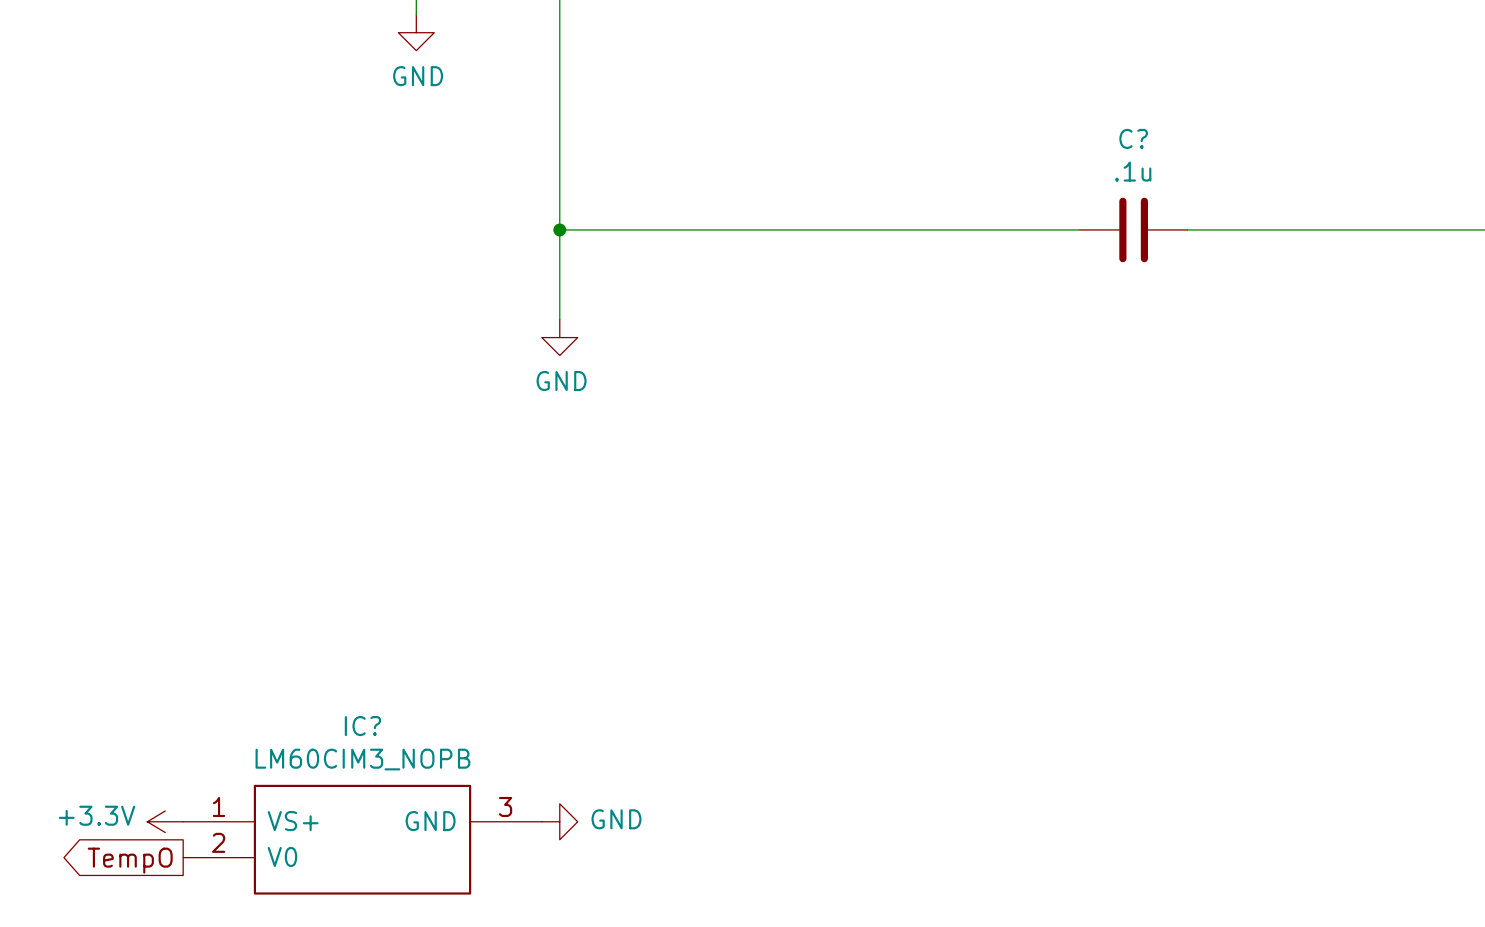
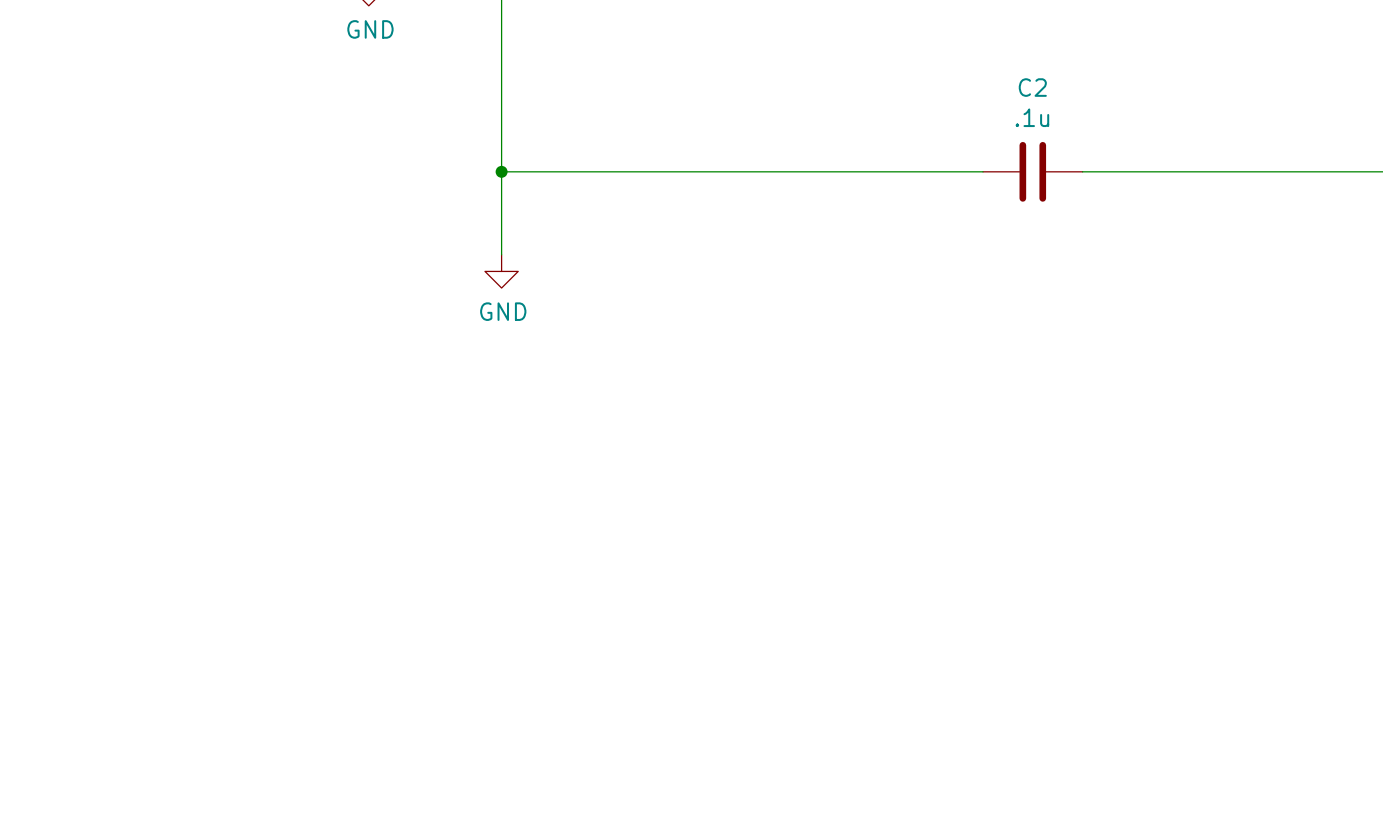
C? name: C? (1133, 138) -> C2 (1032, 87)
power symbol: +3.3V (165, 821) -> none
power symbol: GND (559, 821) -> none
IC?: LM60CIM3_NOPB (362, 839) -> none
global label: TempO (130, 860) -> none

